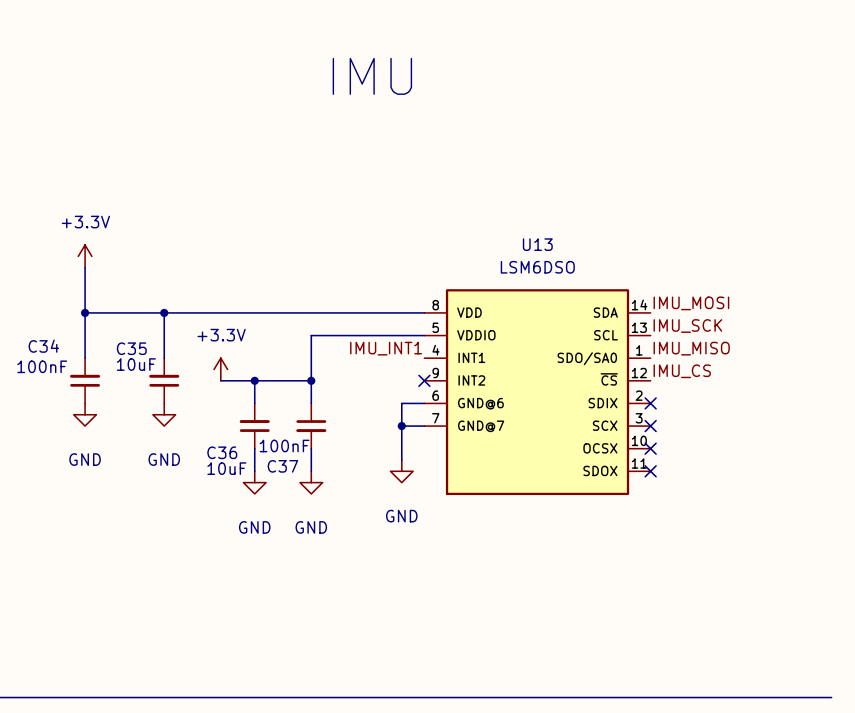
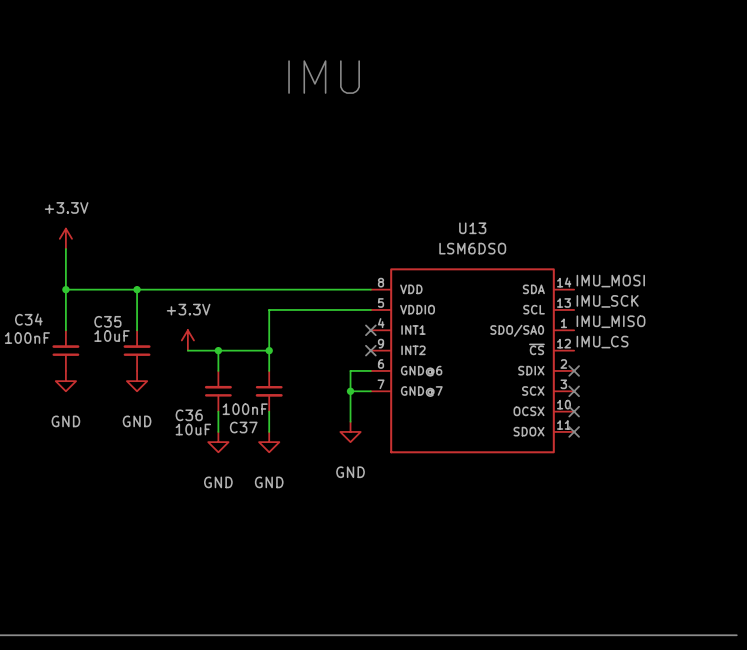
label: IMU_INT1 (386, 348) -> none
no-connect mark: none -> (370, 330)

